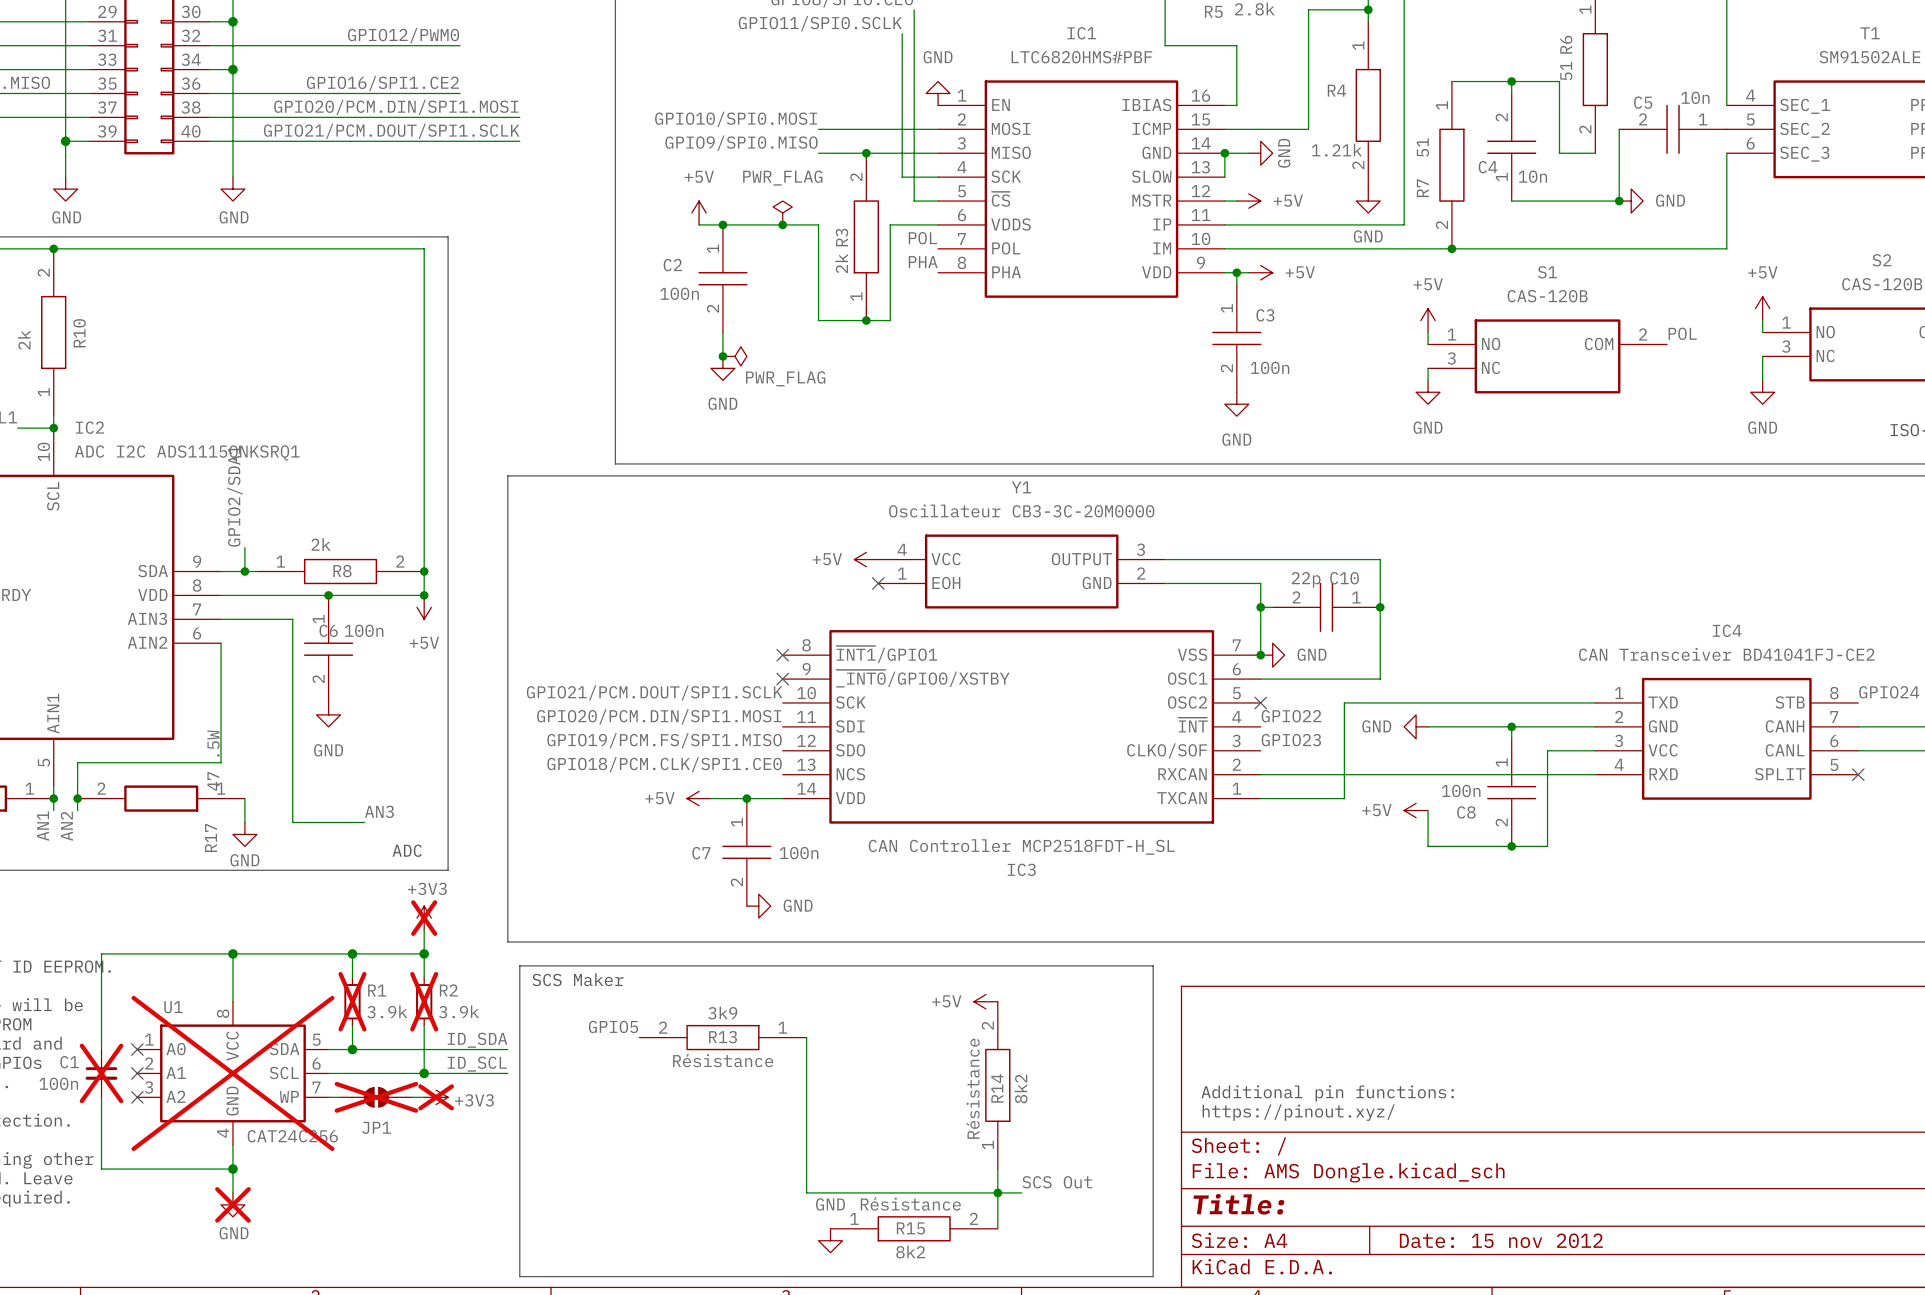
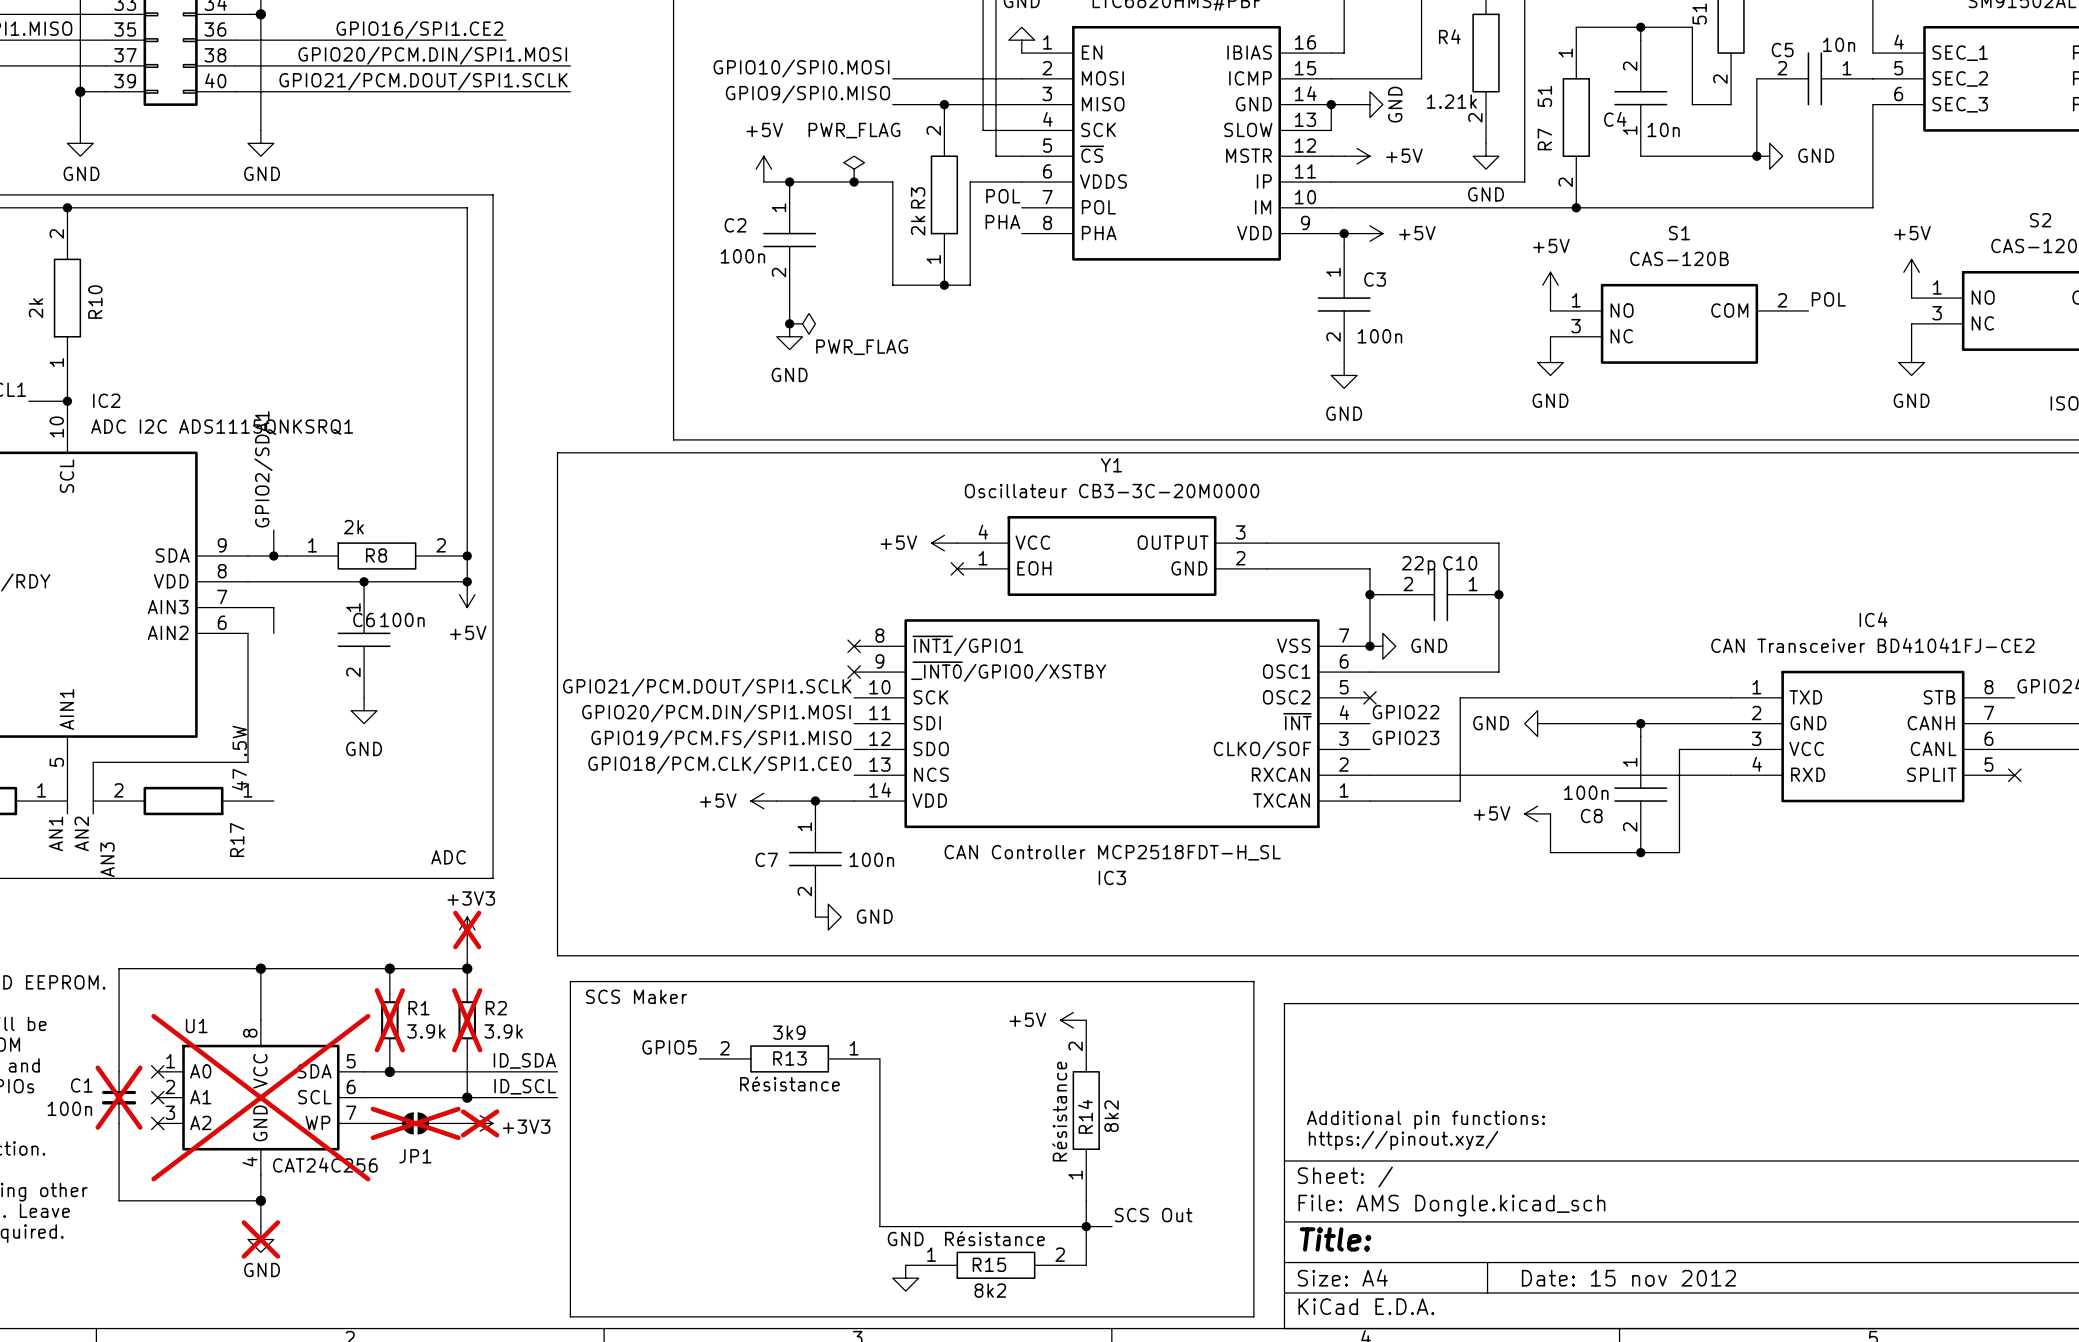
wire: (244, 619) (292, 619) (292, 822) (364, 822) -> (273, 607) (273, 633)
junction: (53, 798) -> none
junction: (77, 798) -> none
wire: (244, 798) (244, 822) -> none
label: AN3 (379, 811) -> none
power symbol: GND (244, 834) -> none
label: none -> AN3 (107, 859)

